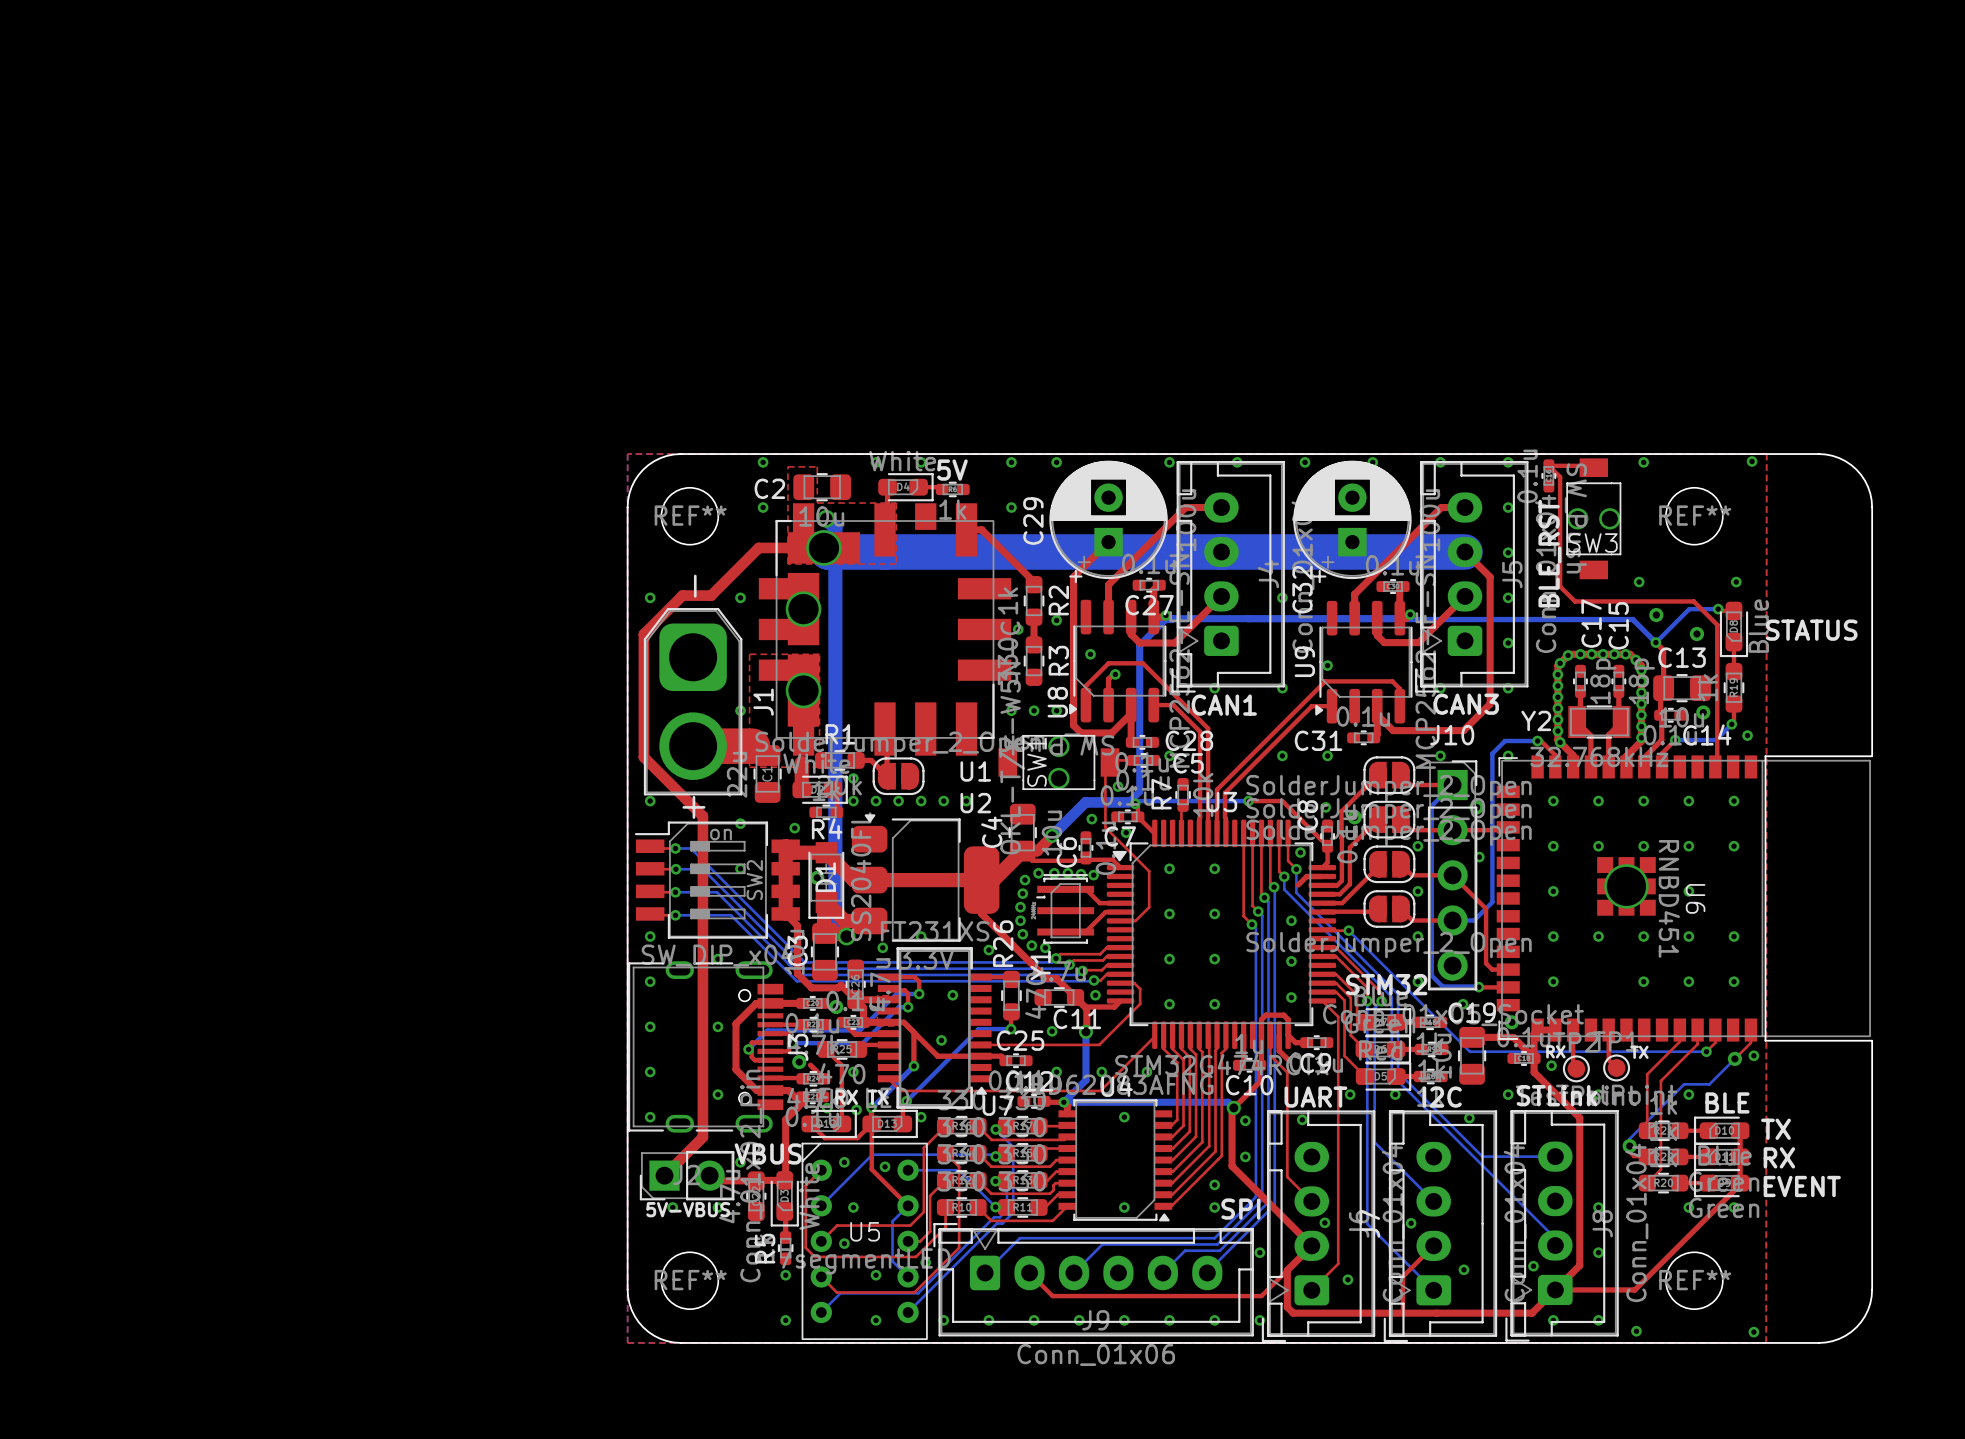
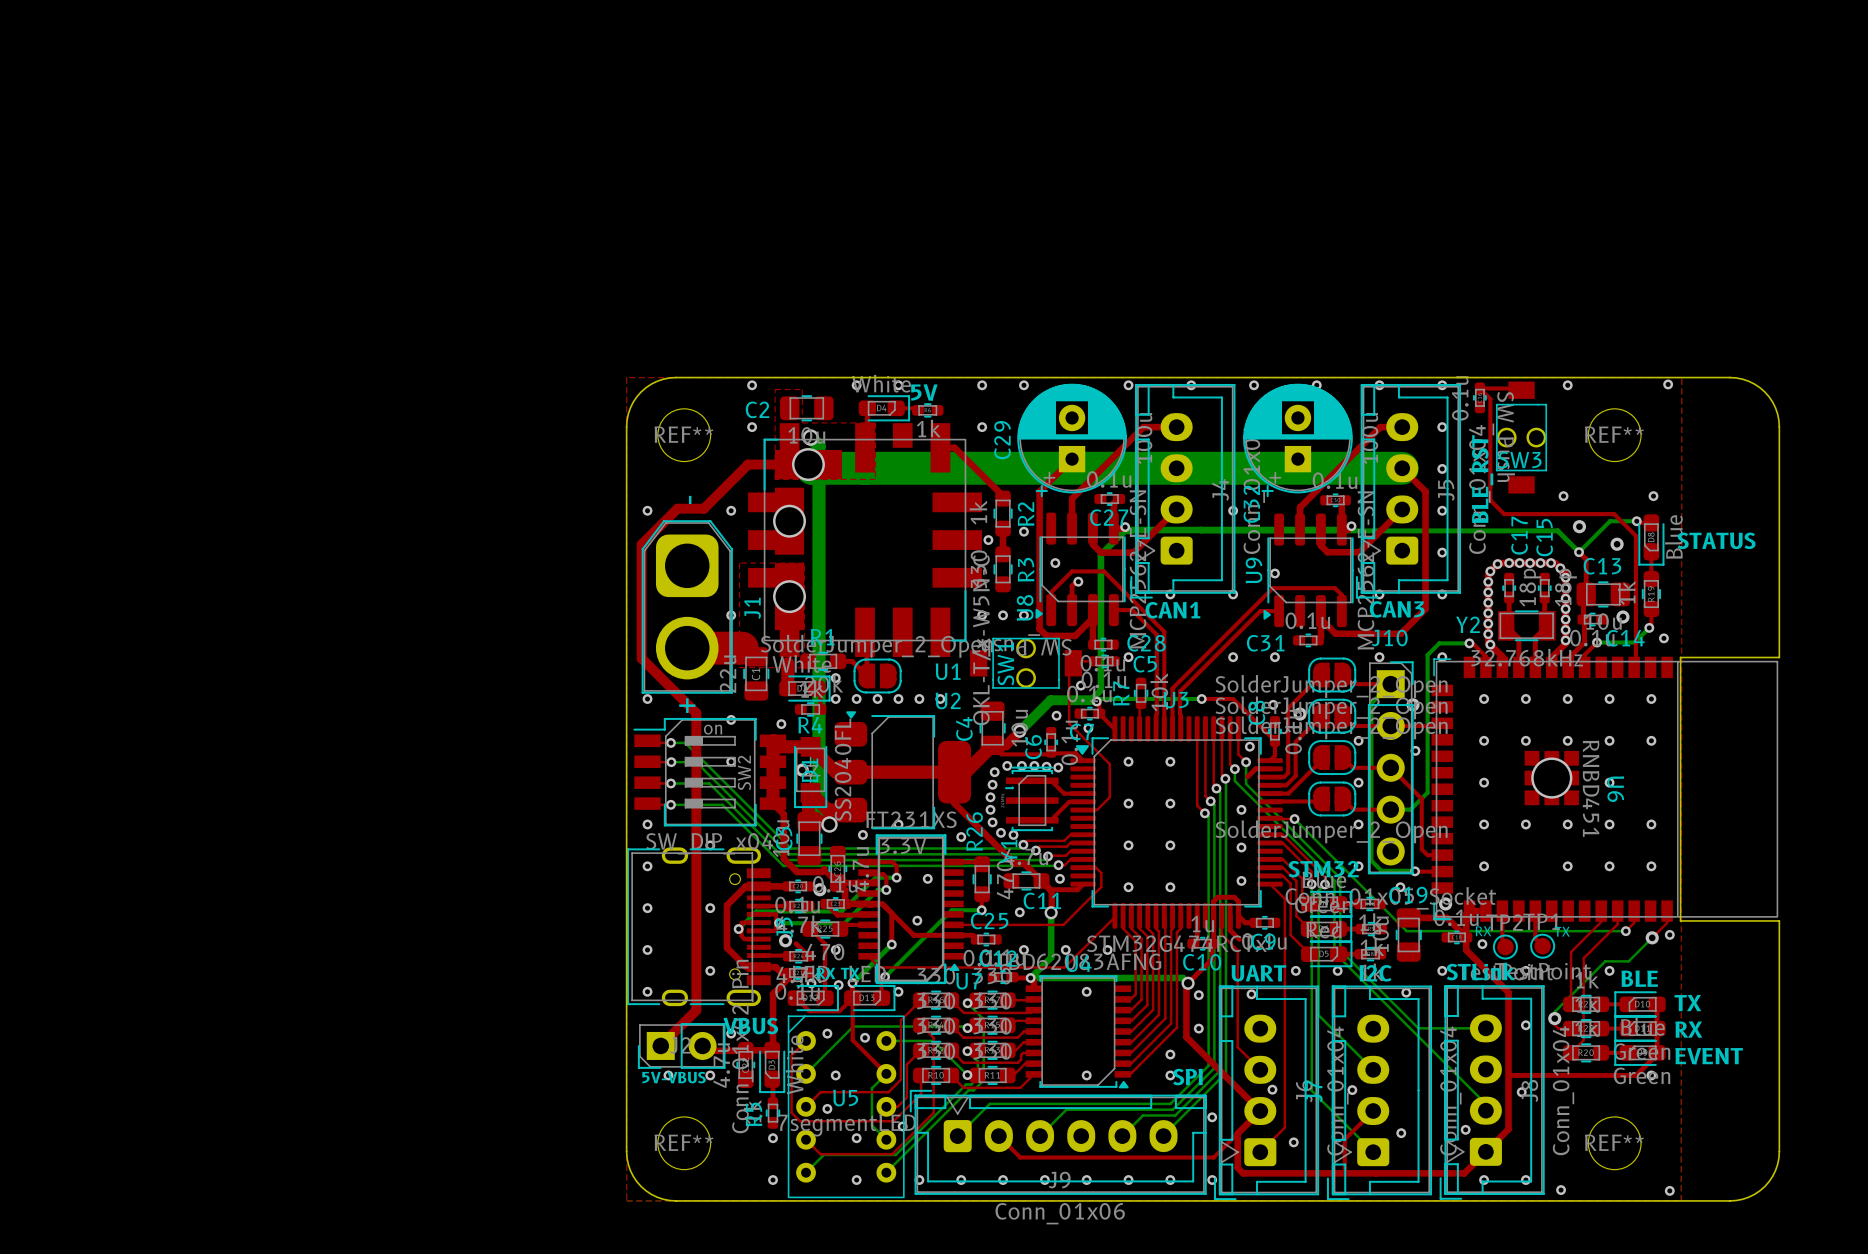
via: none -> (1525, 1025)
top track: (1739, 1184) (1634, 1289) (1555, 1289) -> (1657, 1054) (1636, 1075) (1508, 1075) (1508, 1129)
via: (1598, 1207) -> none
via: (1688, 1207) -> none
via: none -> (1521, 1092)
via: (1598, 1252) -> none

